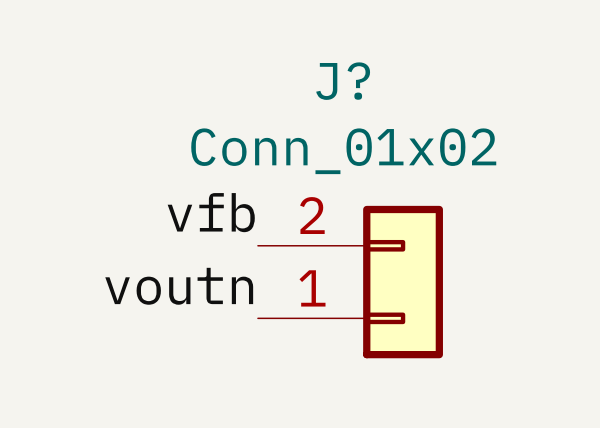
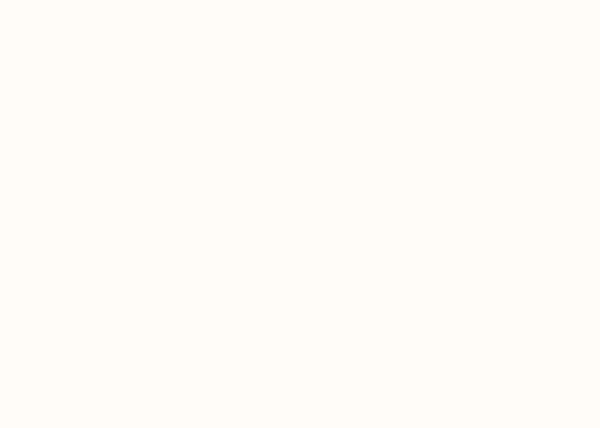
label: vfb (211, 212) -> none
J?: Conn_01x02 (350, 282) -> none
label: voutn (179, 286) -> none

